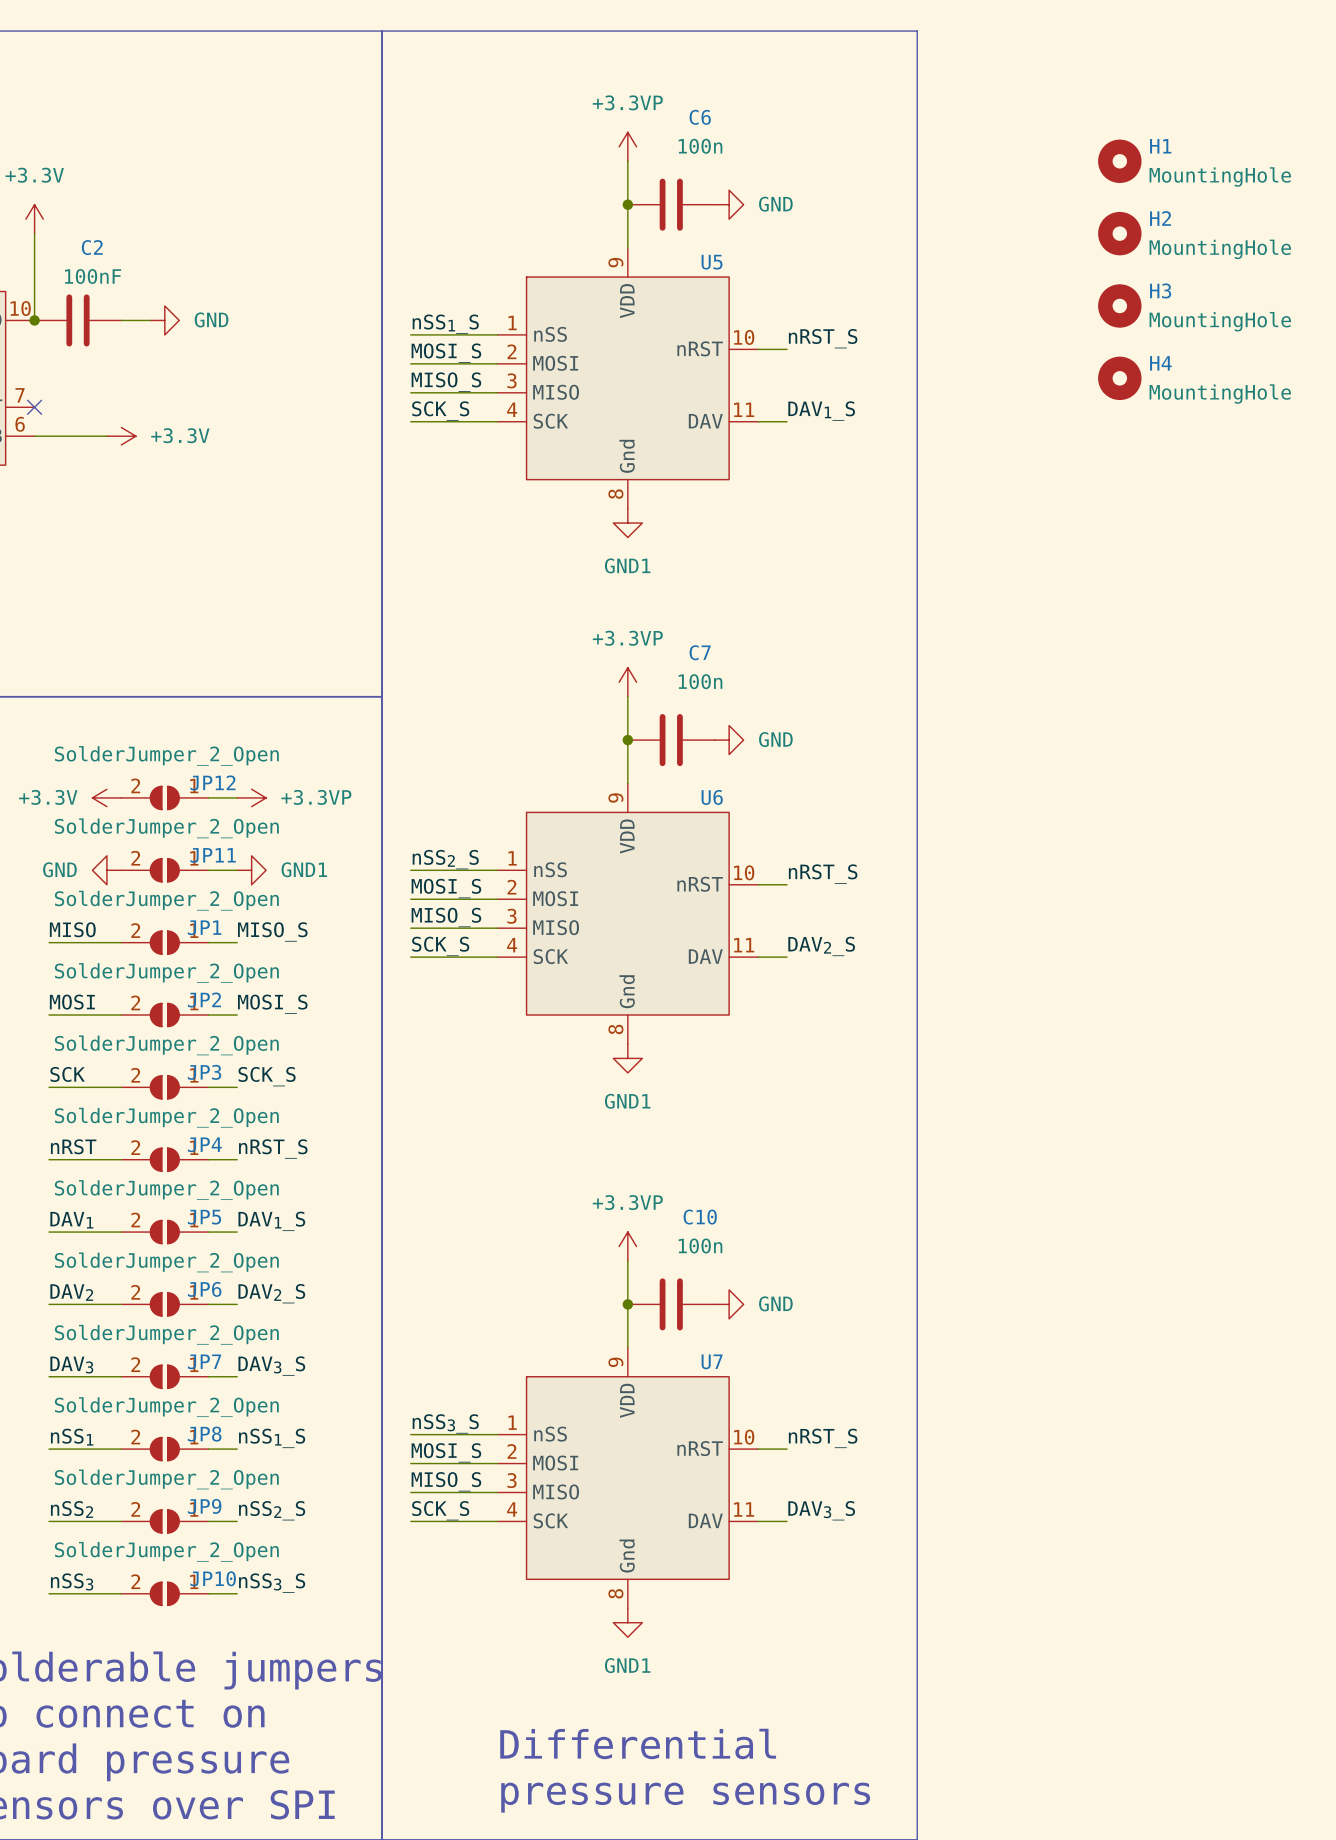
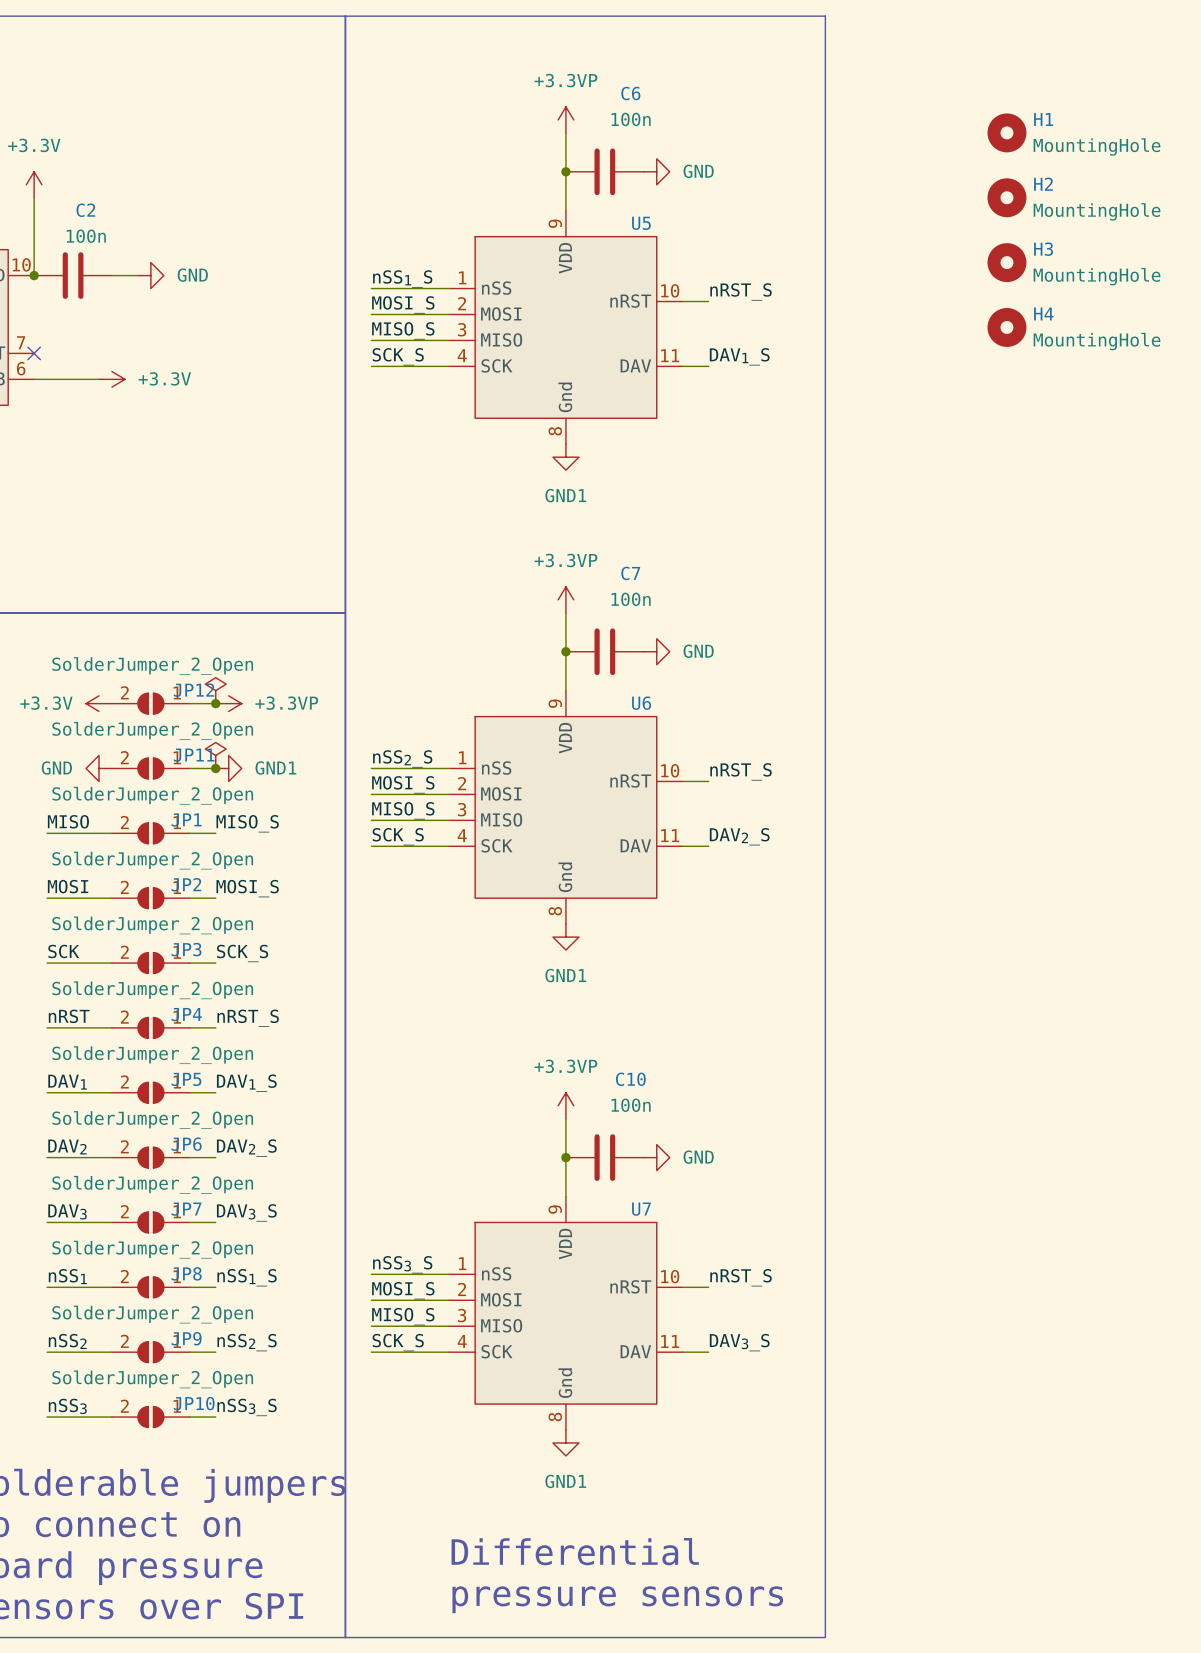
C2 value: 100nF (93, 276) -> 100n (86, 236)
power symbol: none -> (215, 690)
junction: none -> (215, 703)
power symbol: none -> (215, 755)
junction: none -> (215, 768)

